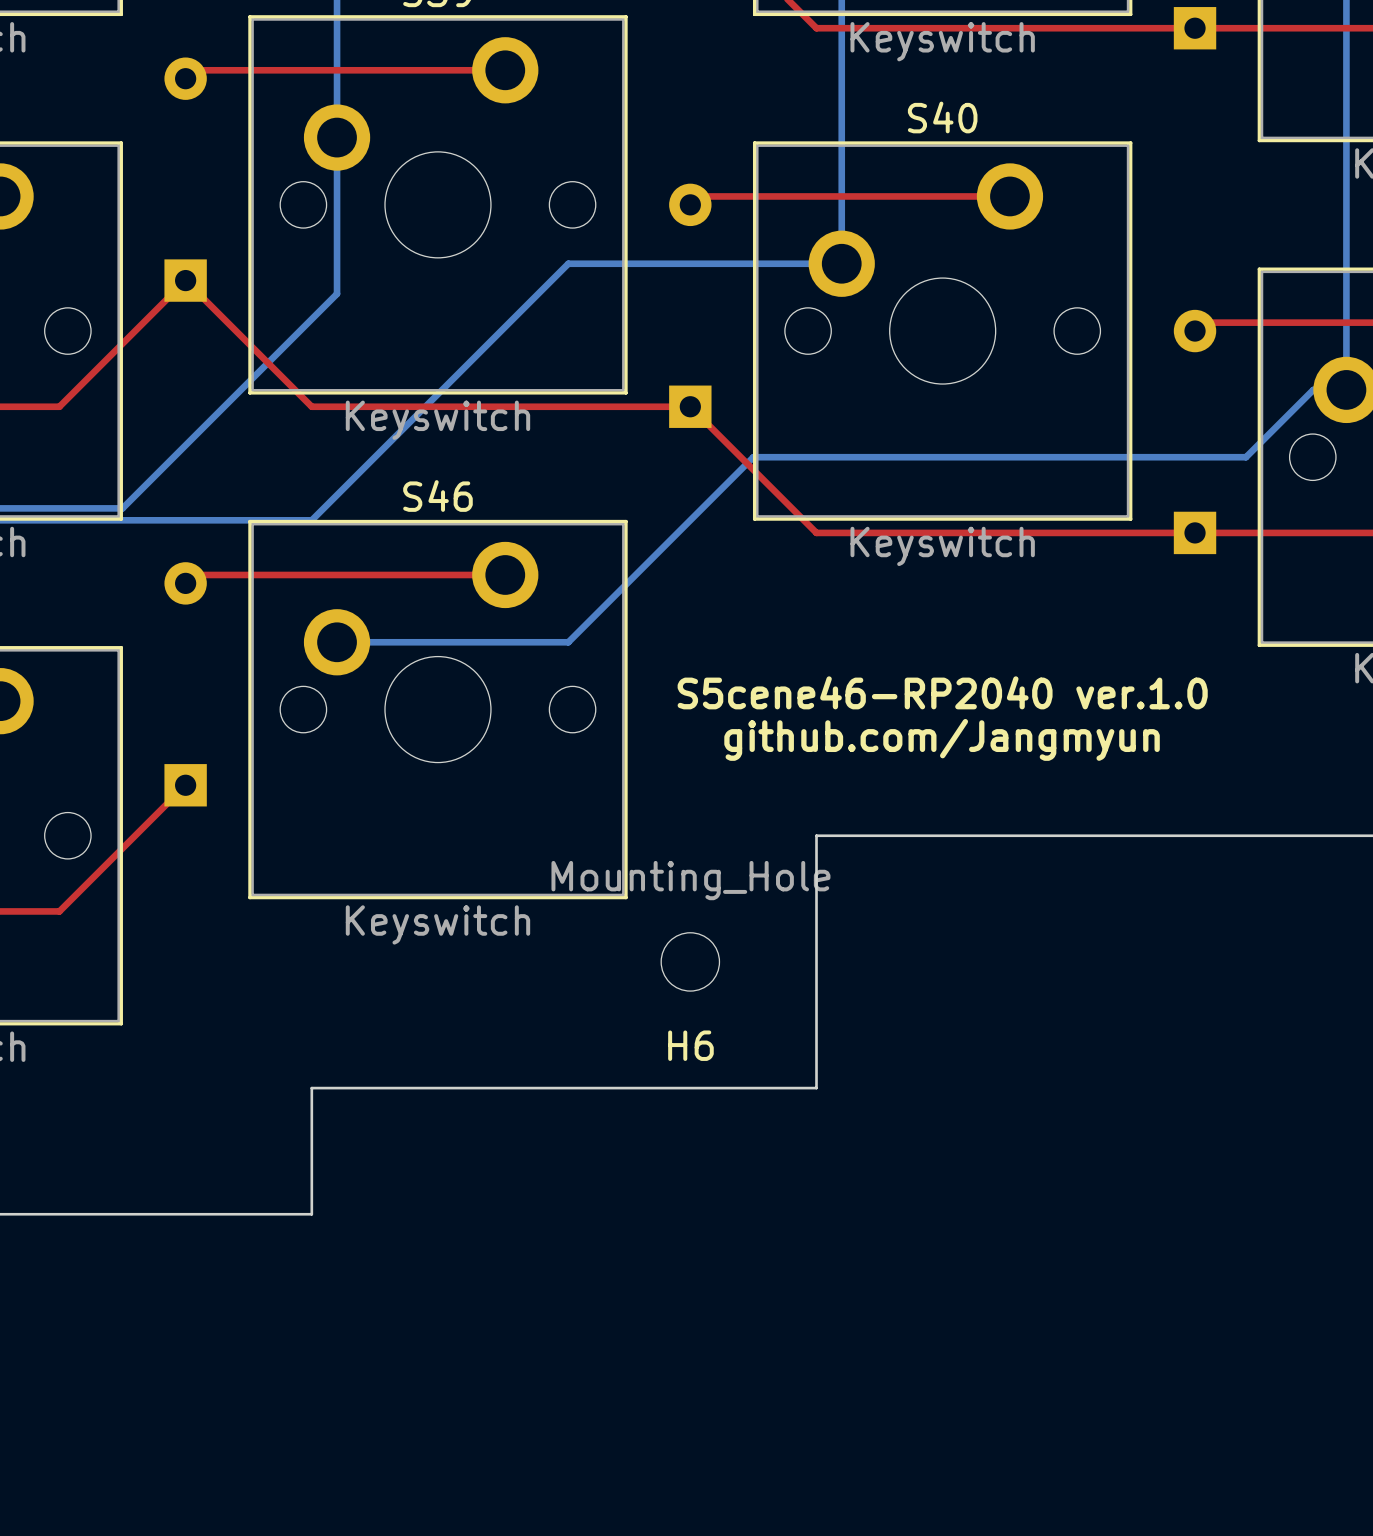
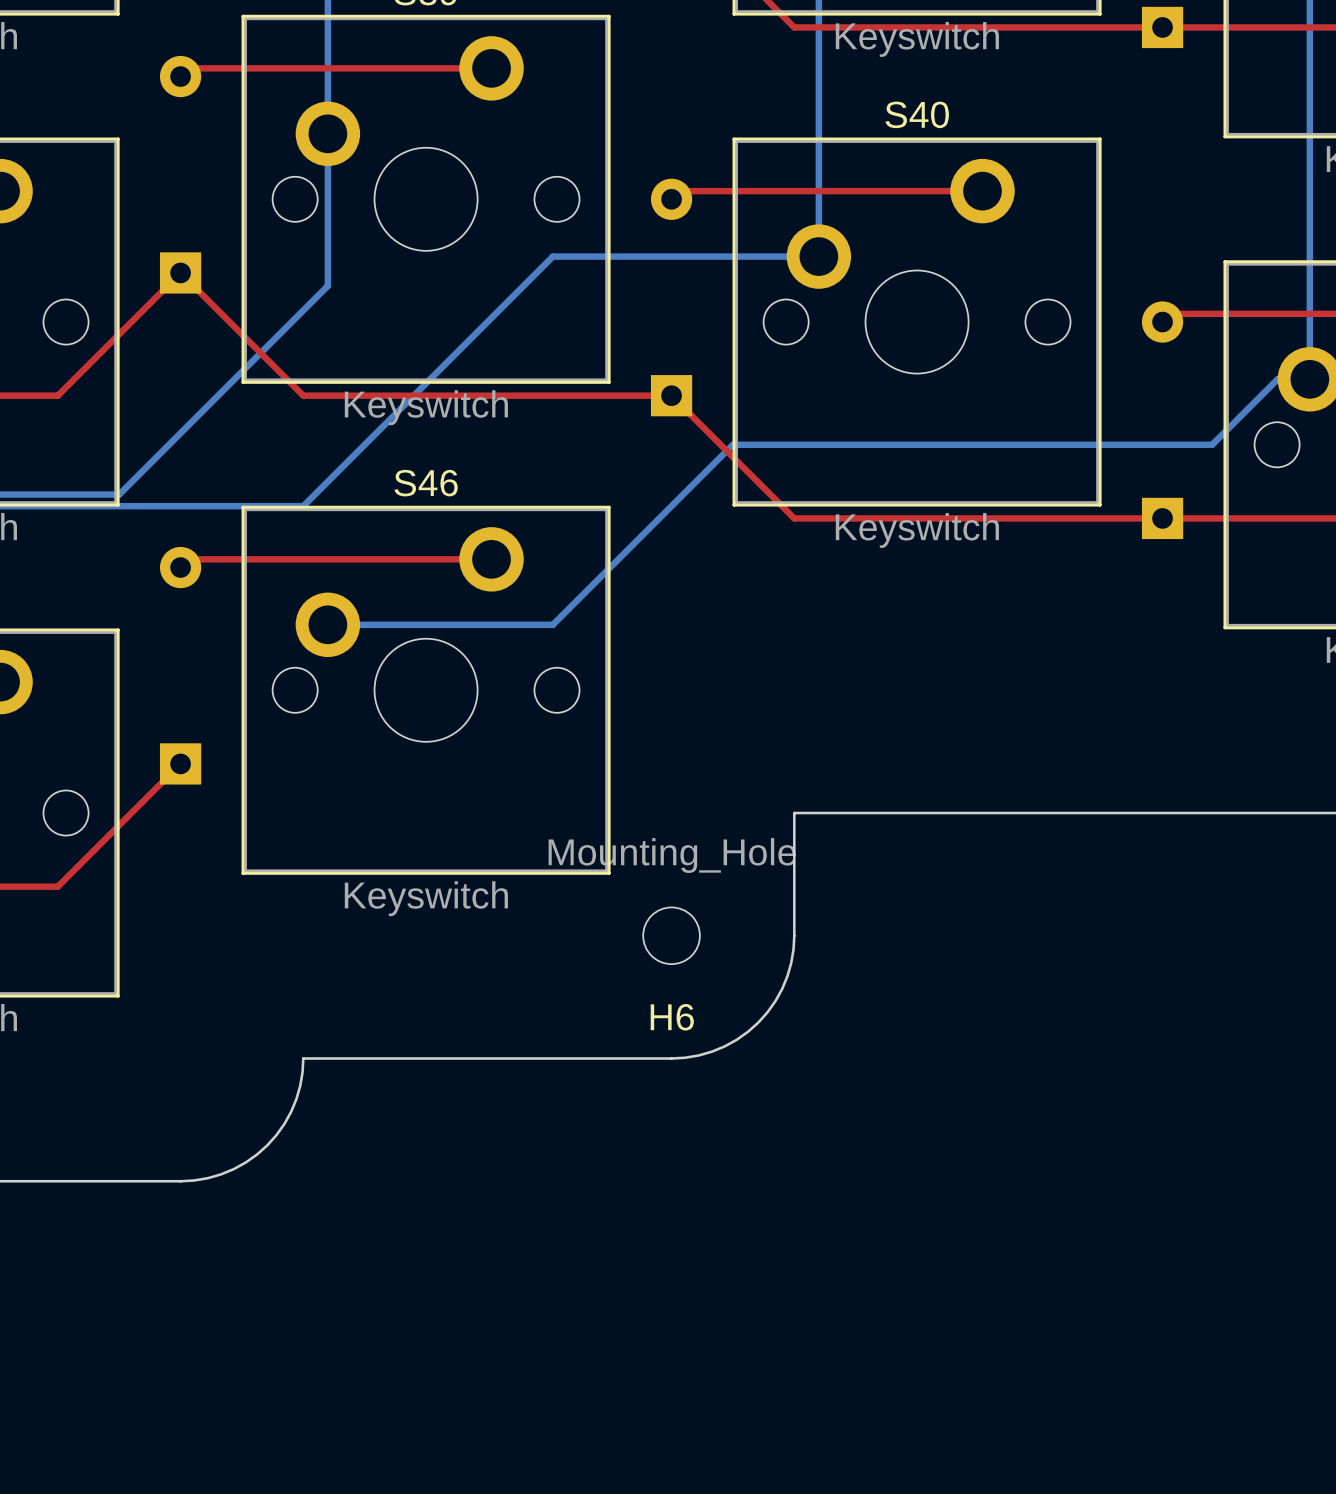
text: S5cene46-RP2040 ver.1.0 (942, 692) -> none
text: github.com/Jangmyun (942, 739) -> none
board edge: (816, 961) (816, 1088) (690, 1088) -> (794, 935) (791, 963) (787, 976) (775, 1001) (758, 1022) (736, 1039) (712, 1051) (685, 1057) (671, 1058)
board edge: (311, 1088) (311, 1214) (185, 1214) -> (303, 1058) (300, 1085) (291, 1111) (284, 1123) (267, 1145) (245, 1162) (221, 1174) (194, 1180) (180, 1181)

